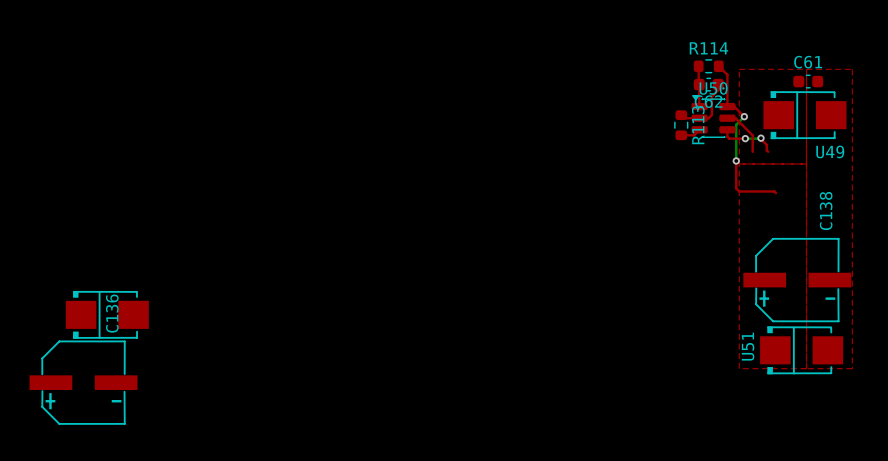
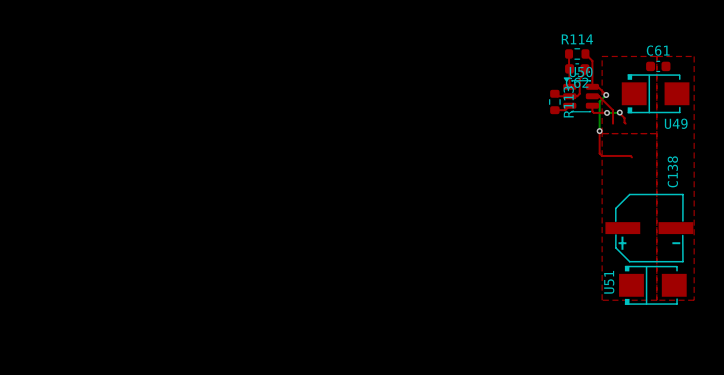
part: (107, 314) -> none
C136: (83, 382) -> none

